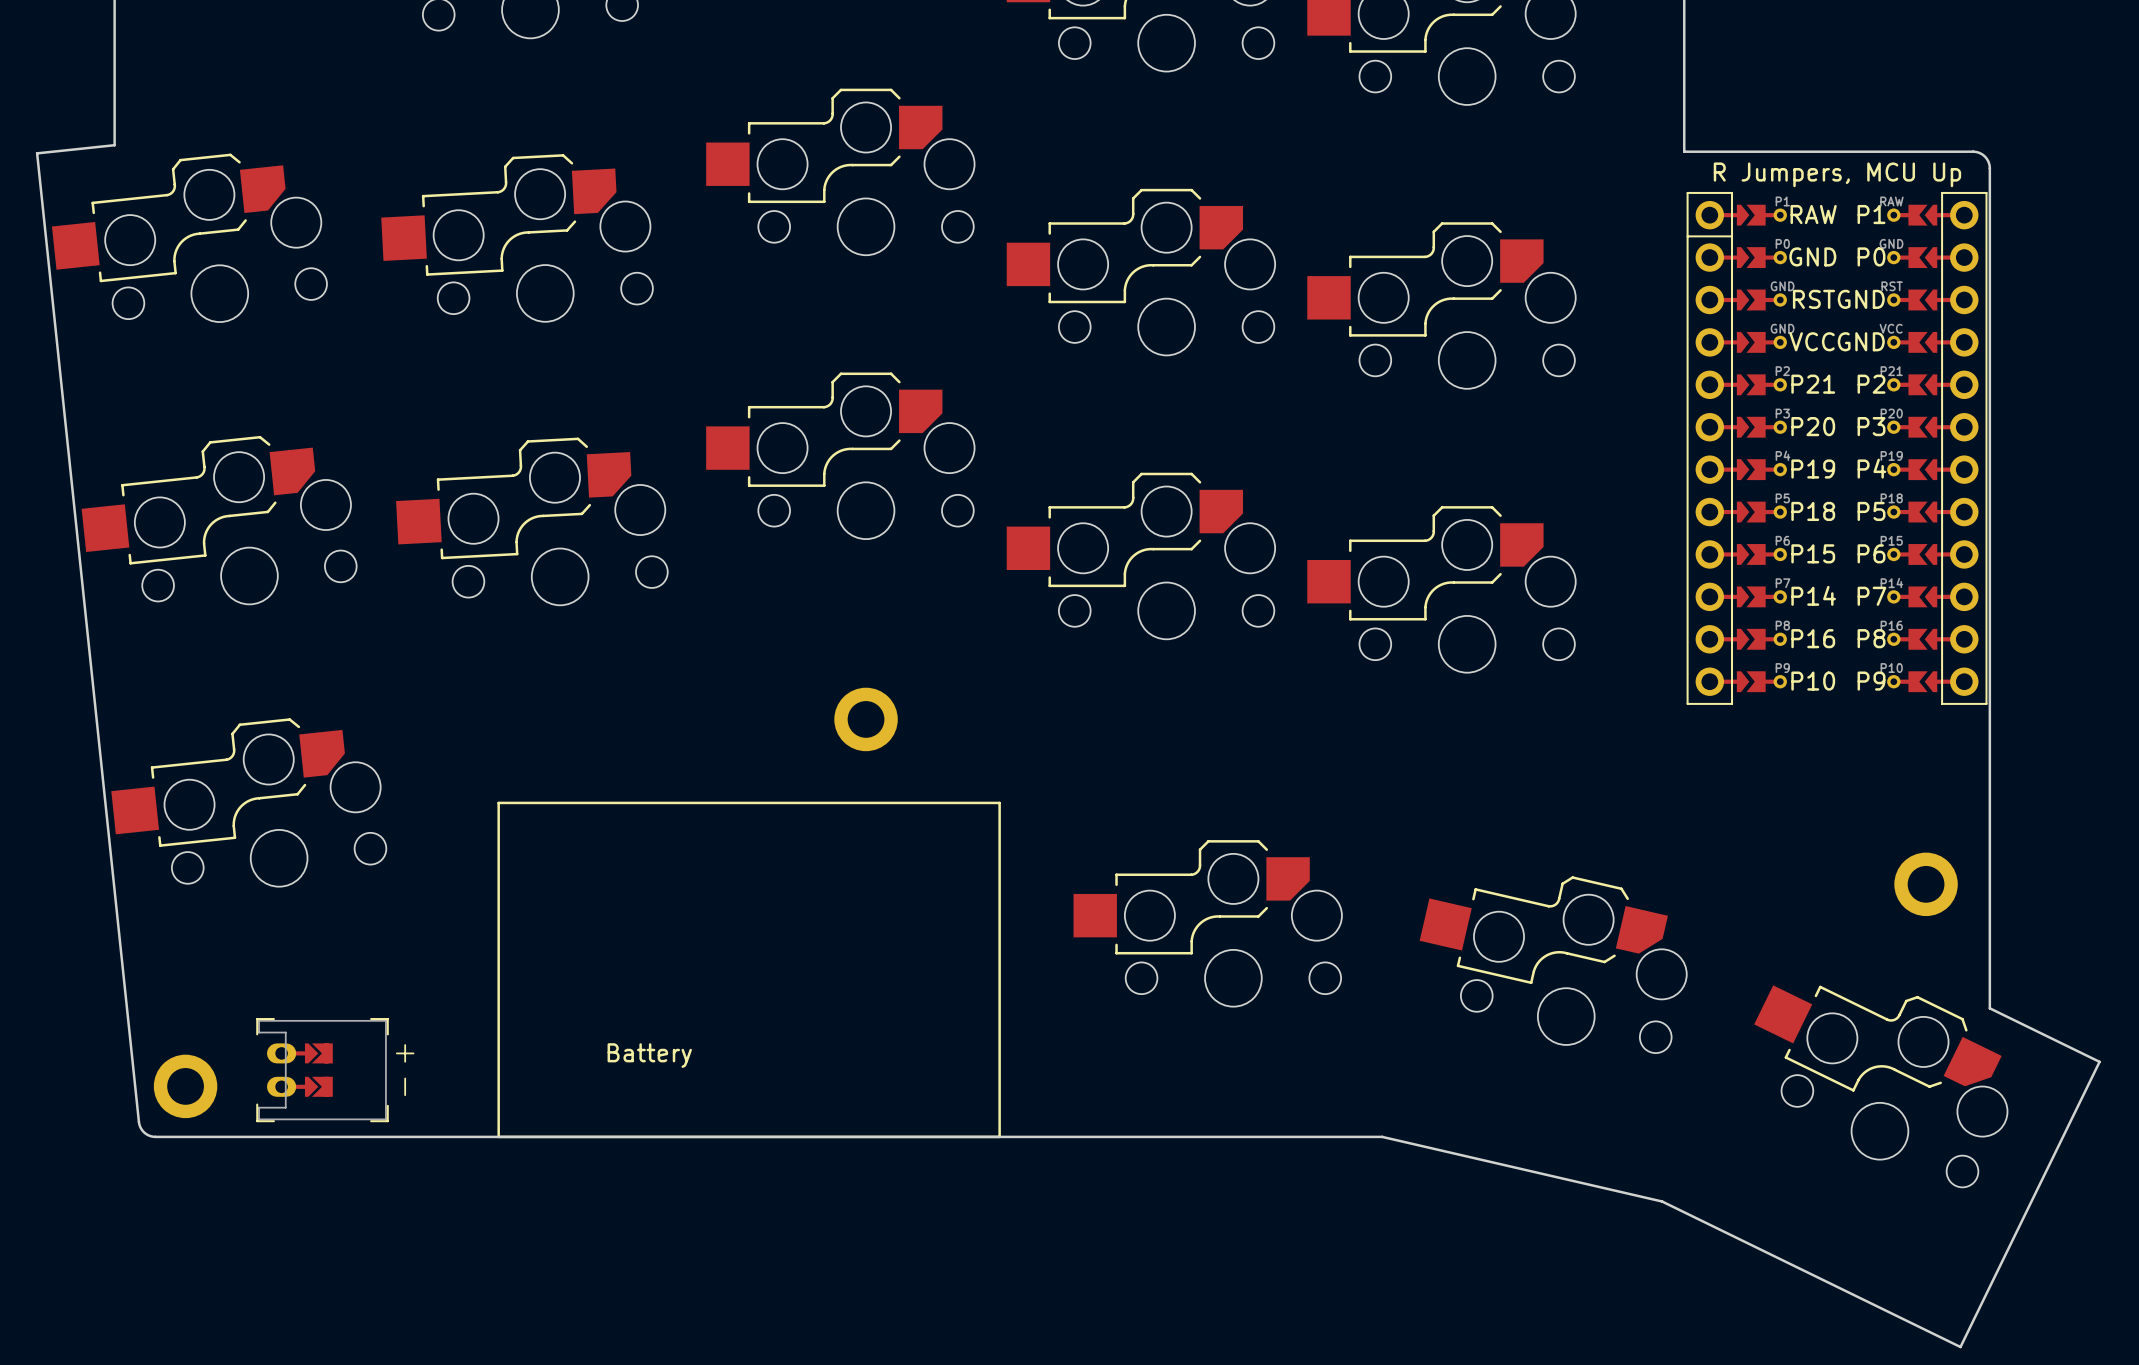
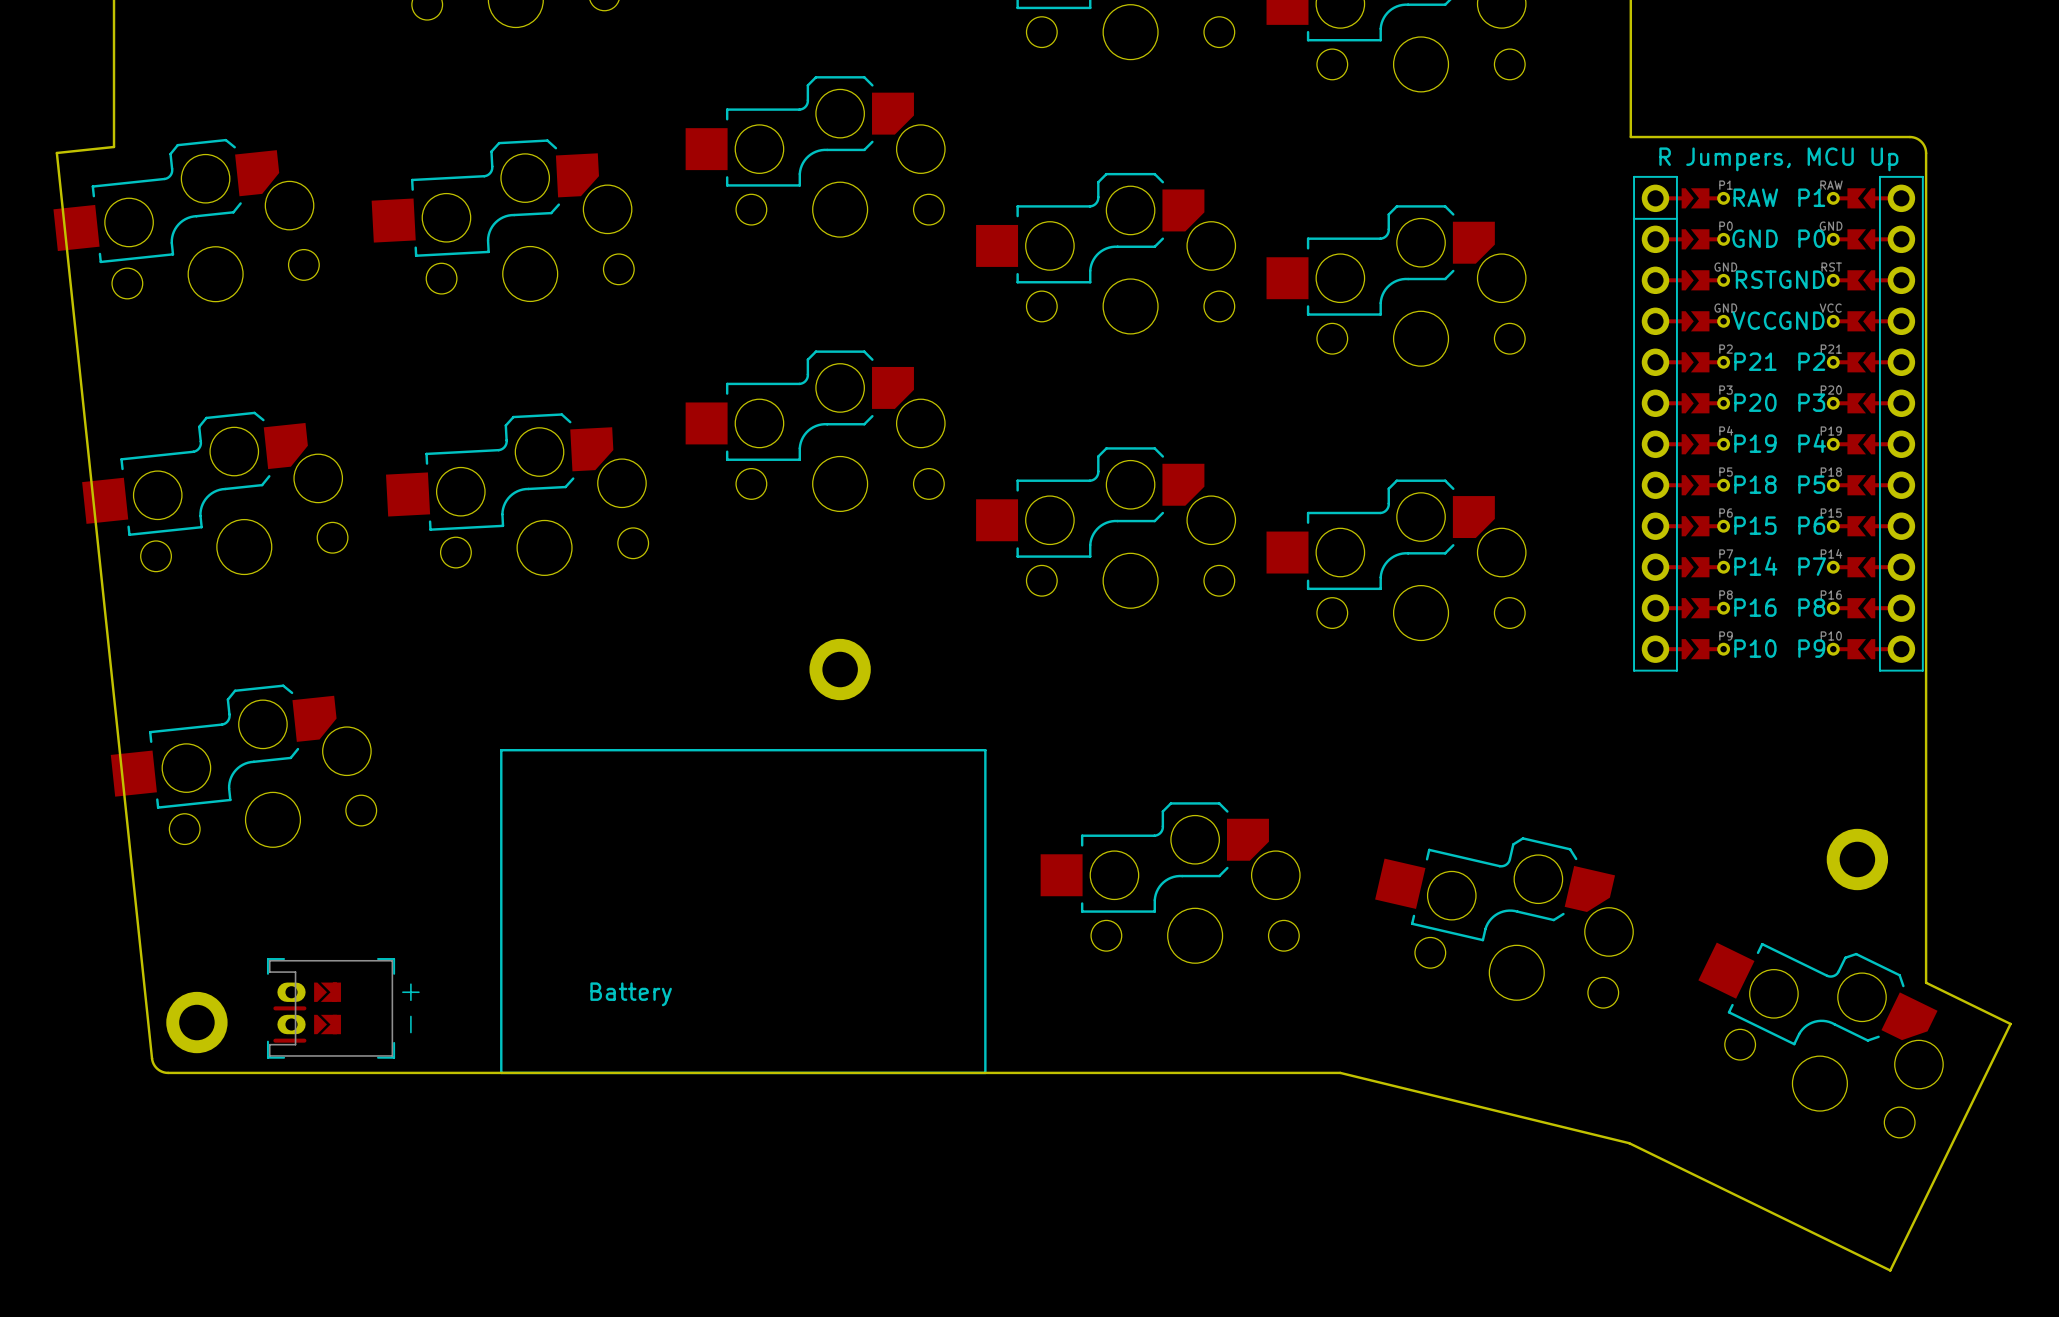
board edge: (114, 145) (37, 153) (138, 1121) (141, 1129) (147, 1134) (155, 1136) (1382, 1136) (1662, 1201) (1960, 1347) (2099, 1061) (1989, 1008) -> (114, 130) (114, 146) (56, 152) (152, 1058) (154, 1065) (160, 1071) (168, 1072) (1340, 1072) (1629, 1143) (1890, 1270) (2010, 1023) (1926, 982) (1926, 964)
part position: (866, 719) -> (840, 669)
line: (498, 802) (498, 1136) (999, 1136) (999, 802) (498, 802) -> (501, 750) (501, 1072) (985, 1072) (985, 750) (501, 750)
part position: (1926, 884) -> (1857, 859)
text position: Battery (649, 1055) -> Battery (631, 994)
part position: (335, 1070) -> (343, 1008)
part position: (185, 1086) -> (196, 1022)

